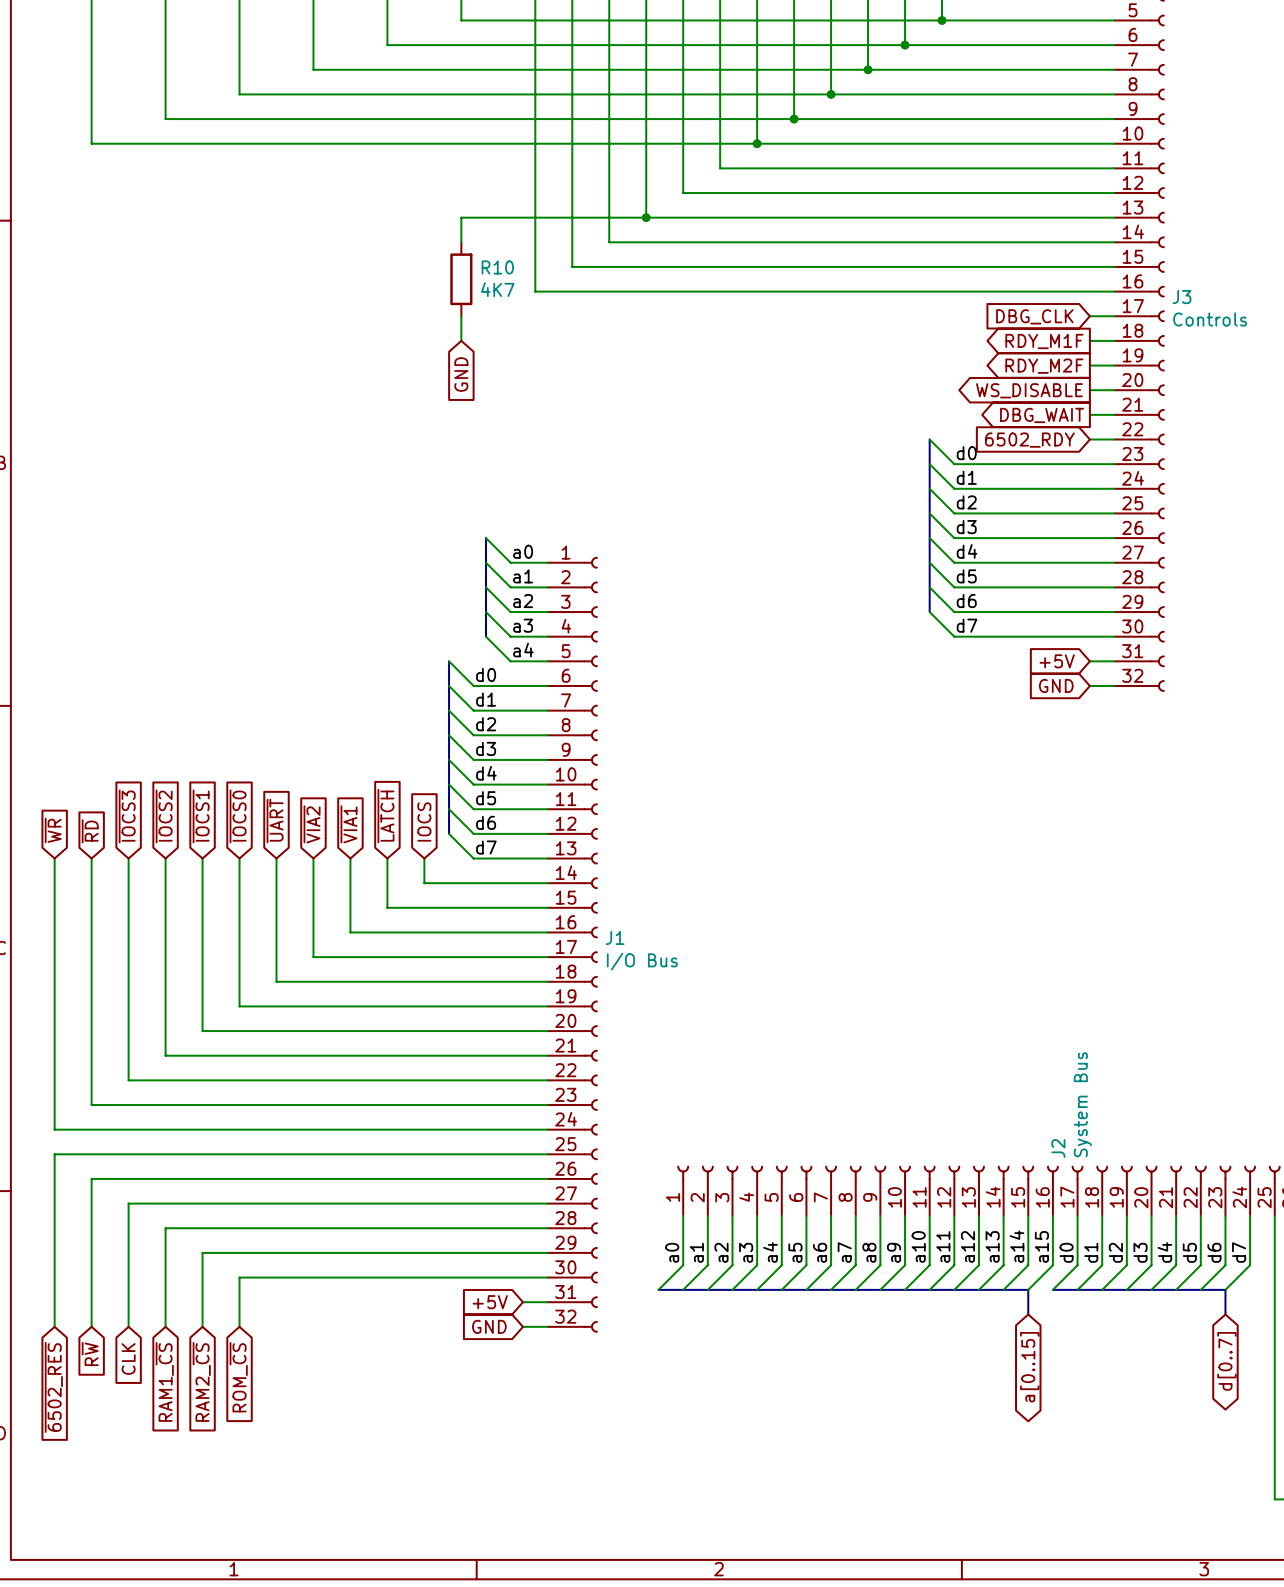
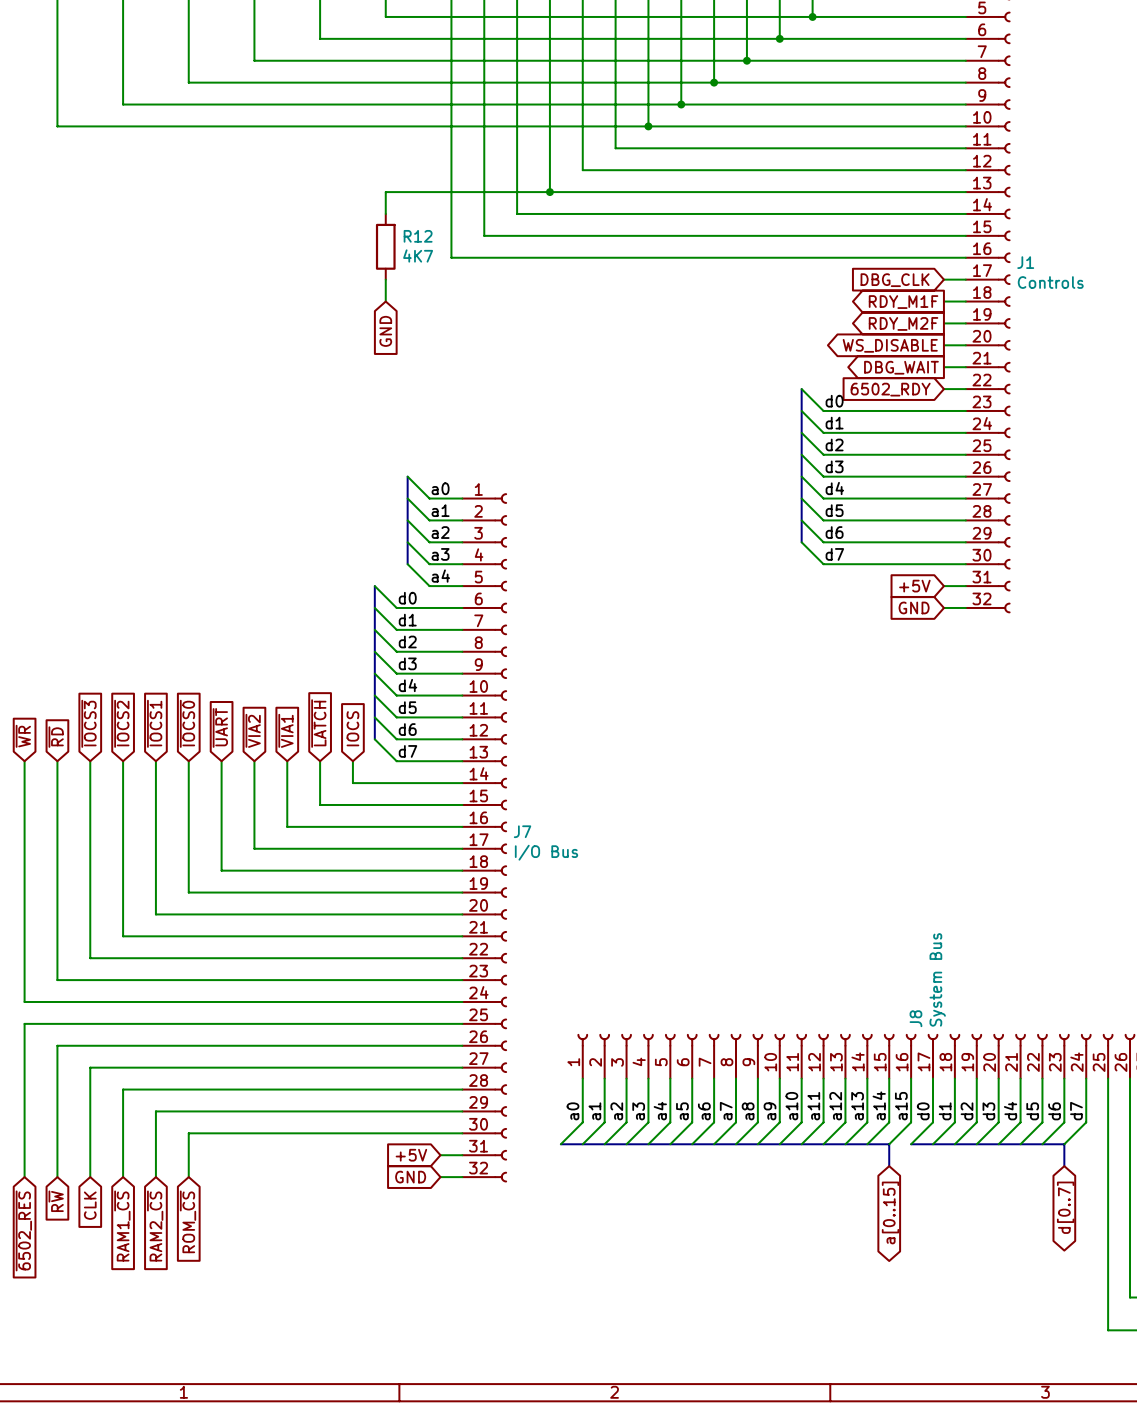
R10 name: R10 (497, 267) -> R12 (418, 236)
J3 name: J3 (1181, 297) -> J1 (1025, 262)
J1 name: J1 (615, 937) -> J7 (522, 831)
J2 name: J2 (1058, 1148) -> J8 (915, 1018)

